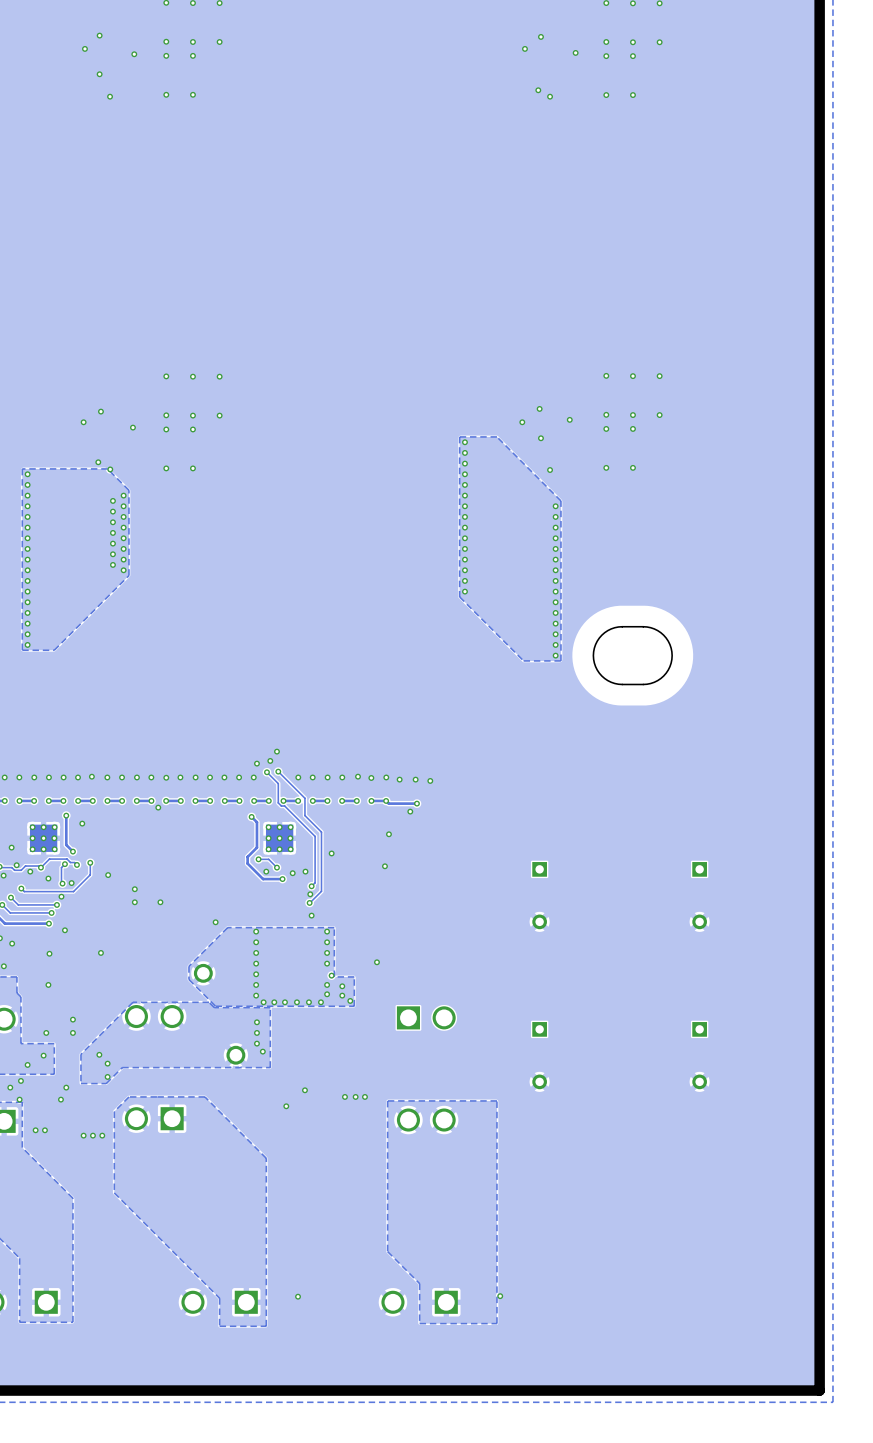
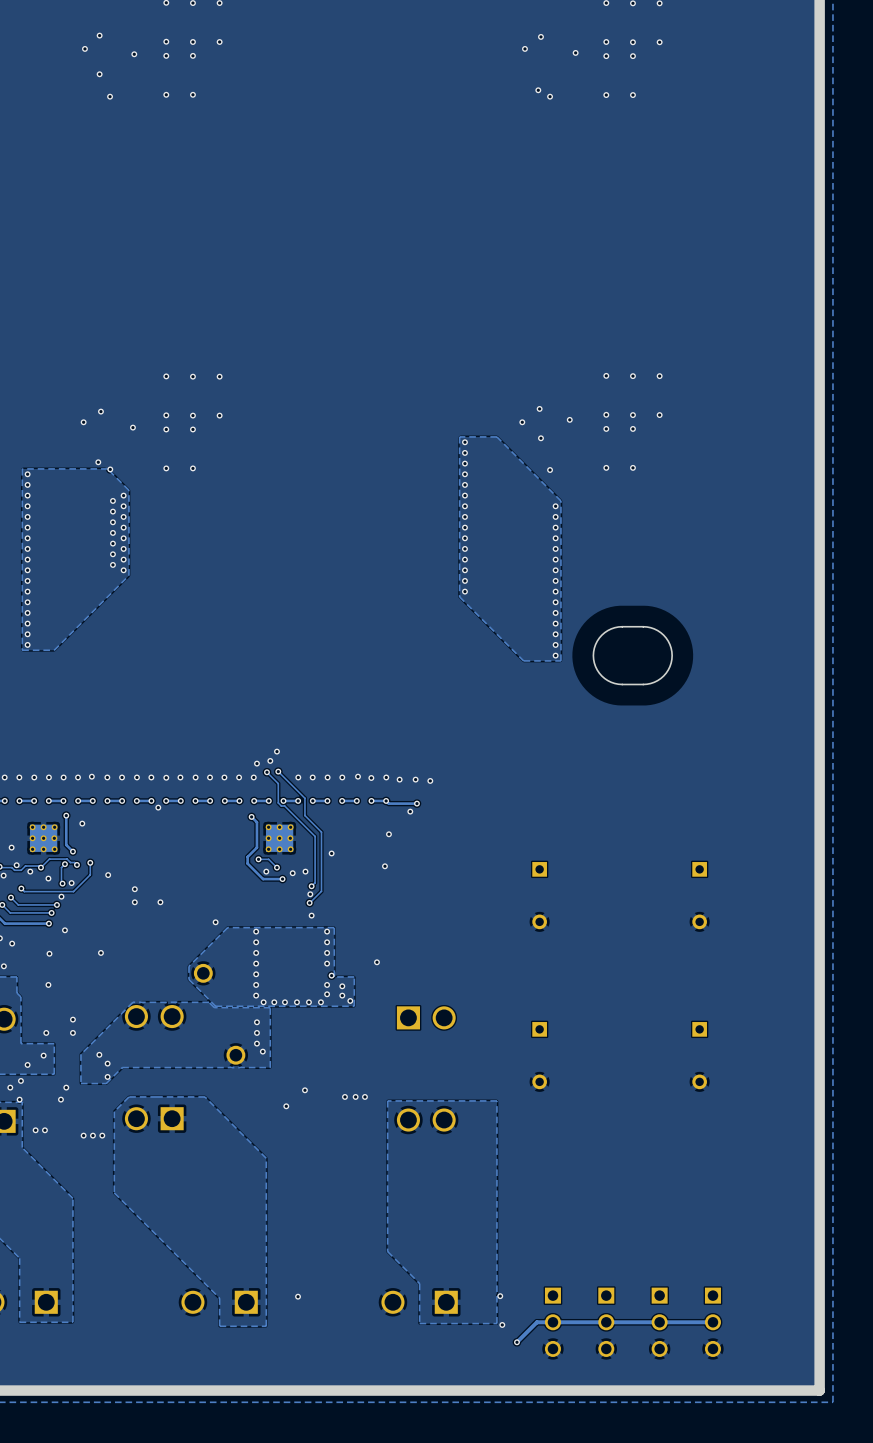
part: none -> (552, 1322)
part: none -> (606, 1322)
part: none -> (659, 1322)
track: none -> (712, 1322) (536, 1322) (516, 1342)
part: none -> (712, 1322)
via: none -> (502, 1324)
via: none -> (516, 1342)

